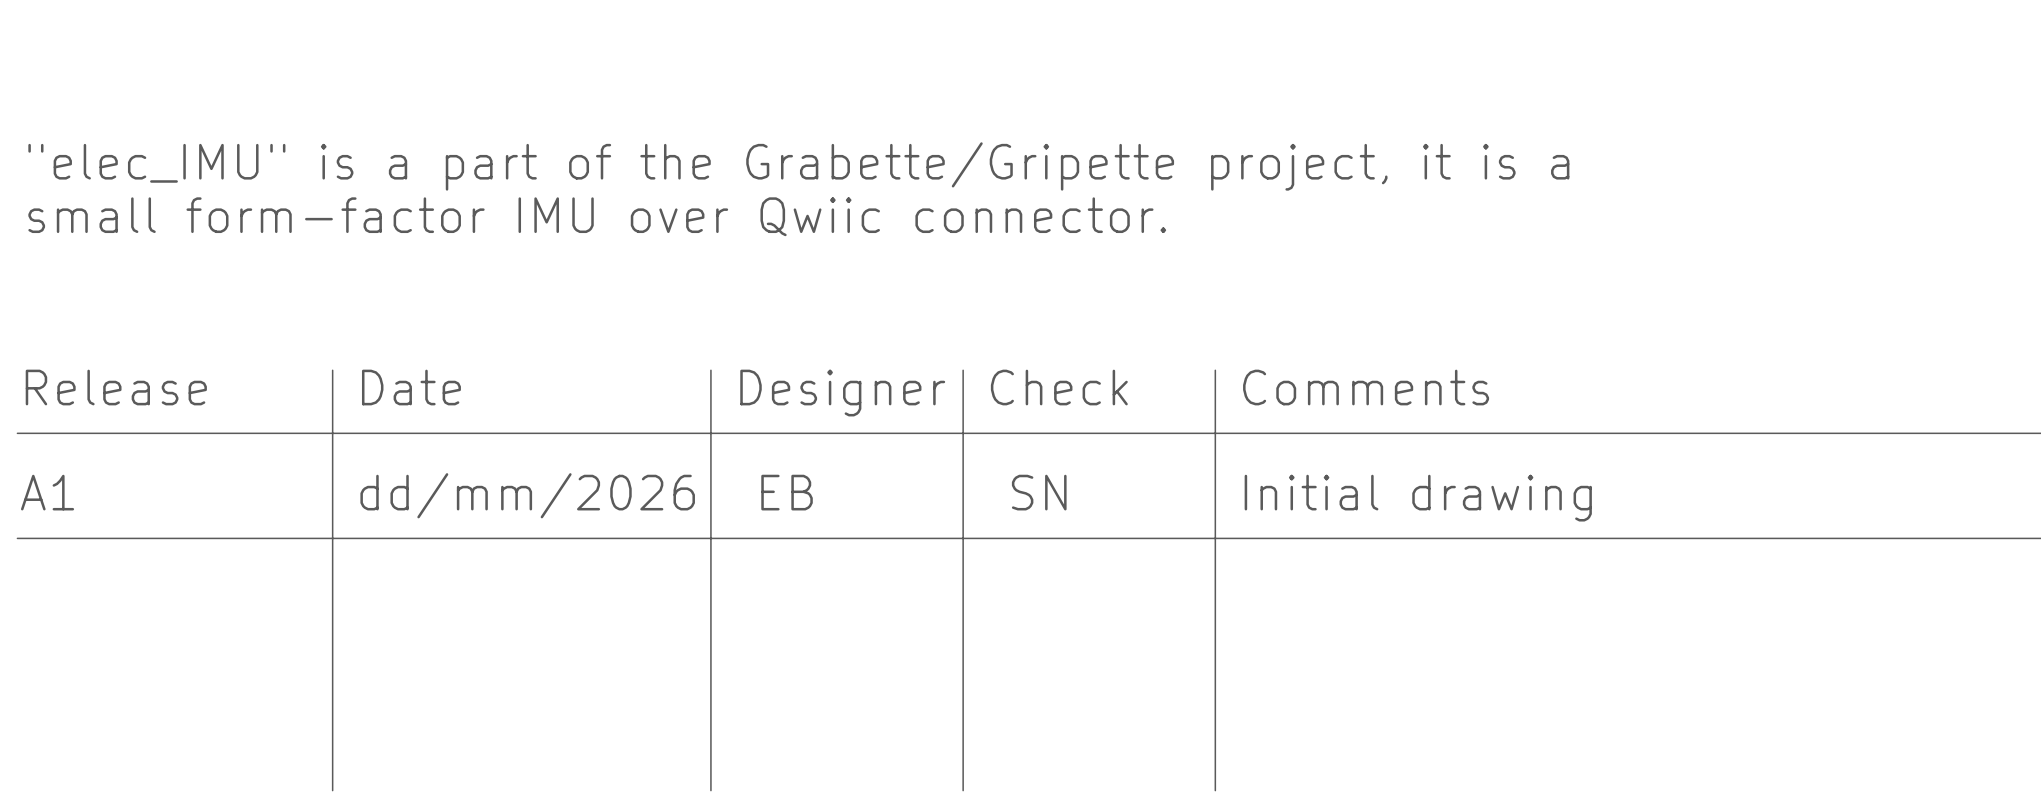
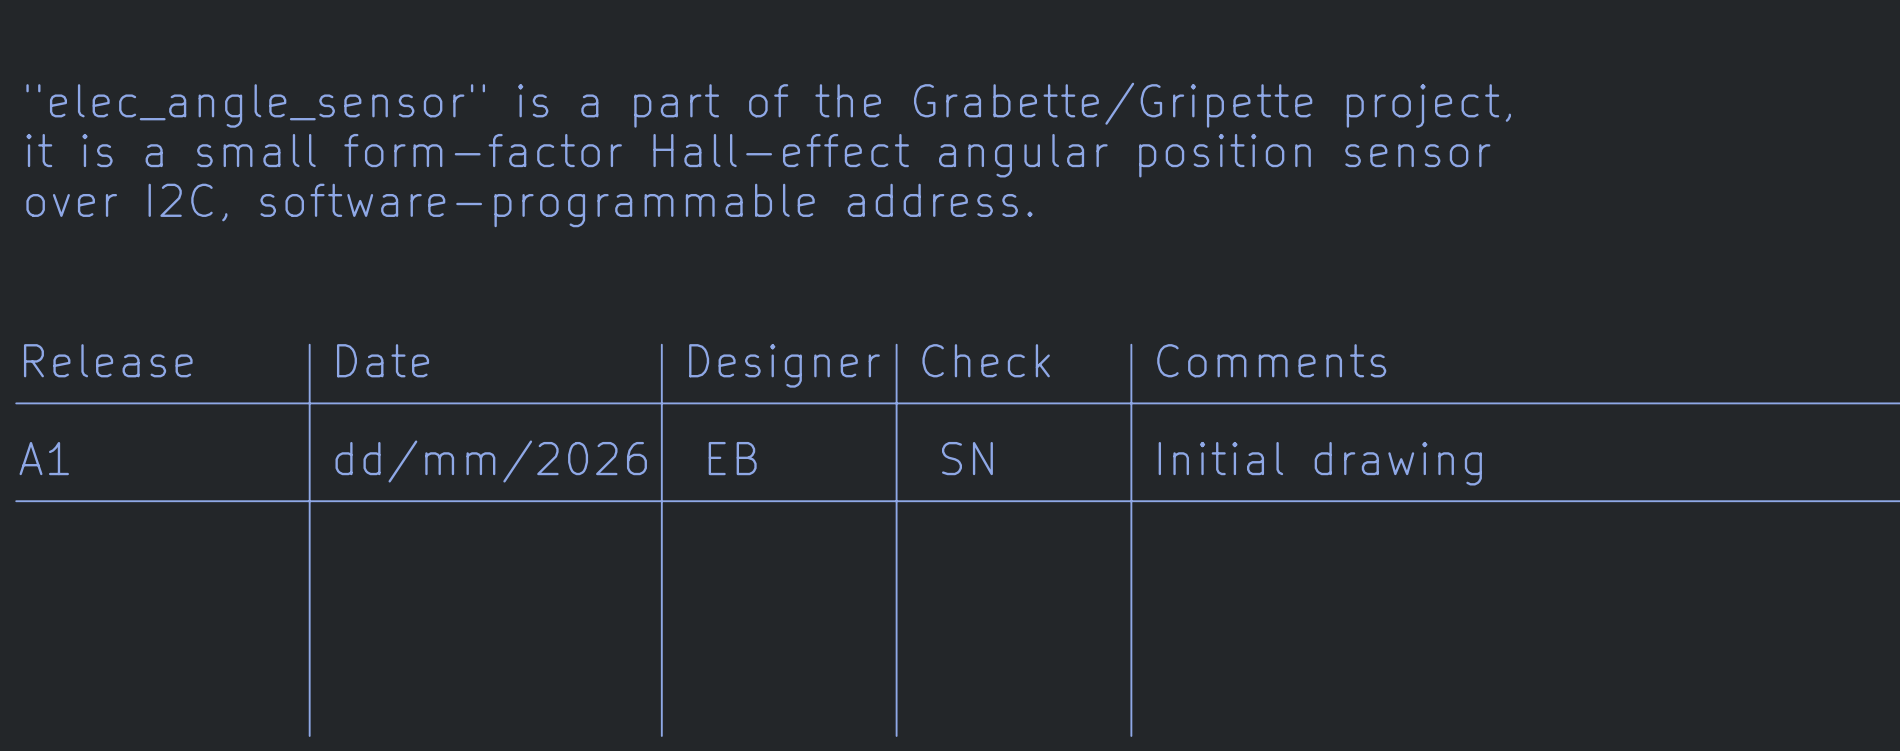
text: none -> "elec_angle_sensor" is a part of the Grabette/Gripette project, (768, 105)
text: "elec_IMU" is a part of the Grabette/Gripette project, it is a (798, 166) -> it is a small form-factor Hall-effect angular position sensor (758, 155)
text: small form-factor IMU over Qwiic connector. (597, 216) -> over I2C, software-programmable address. (529, 205)

